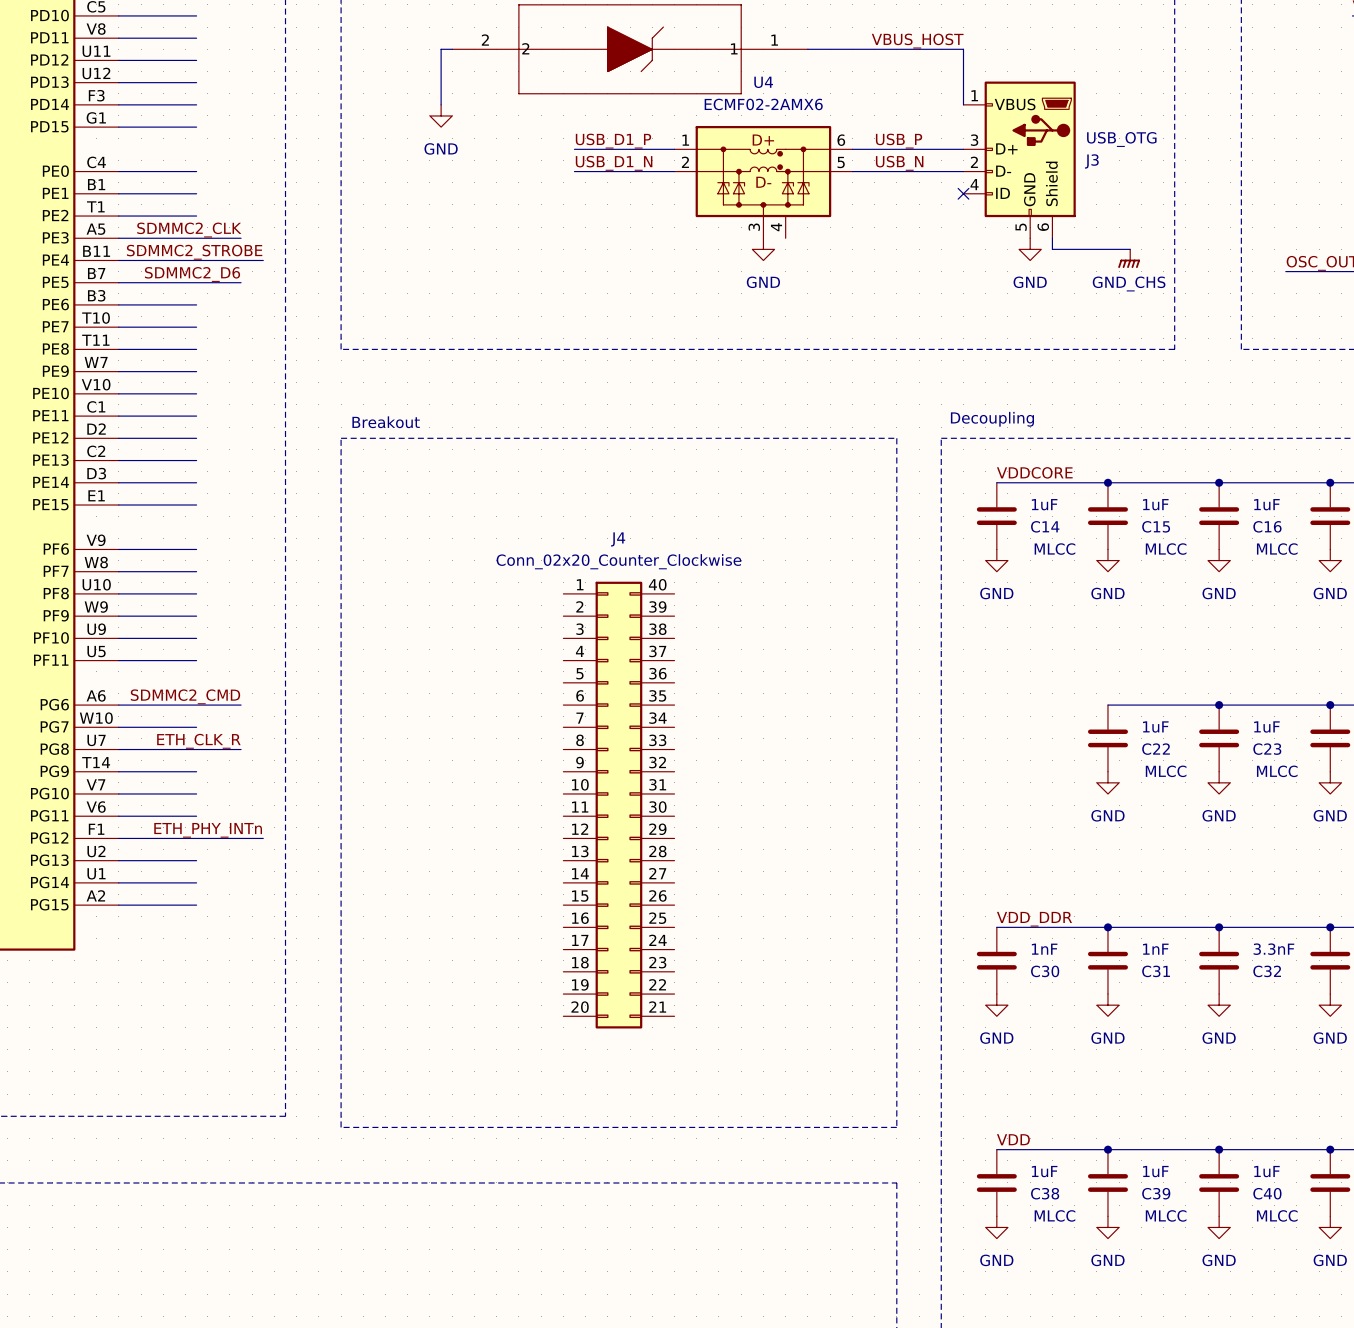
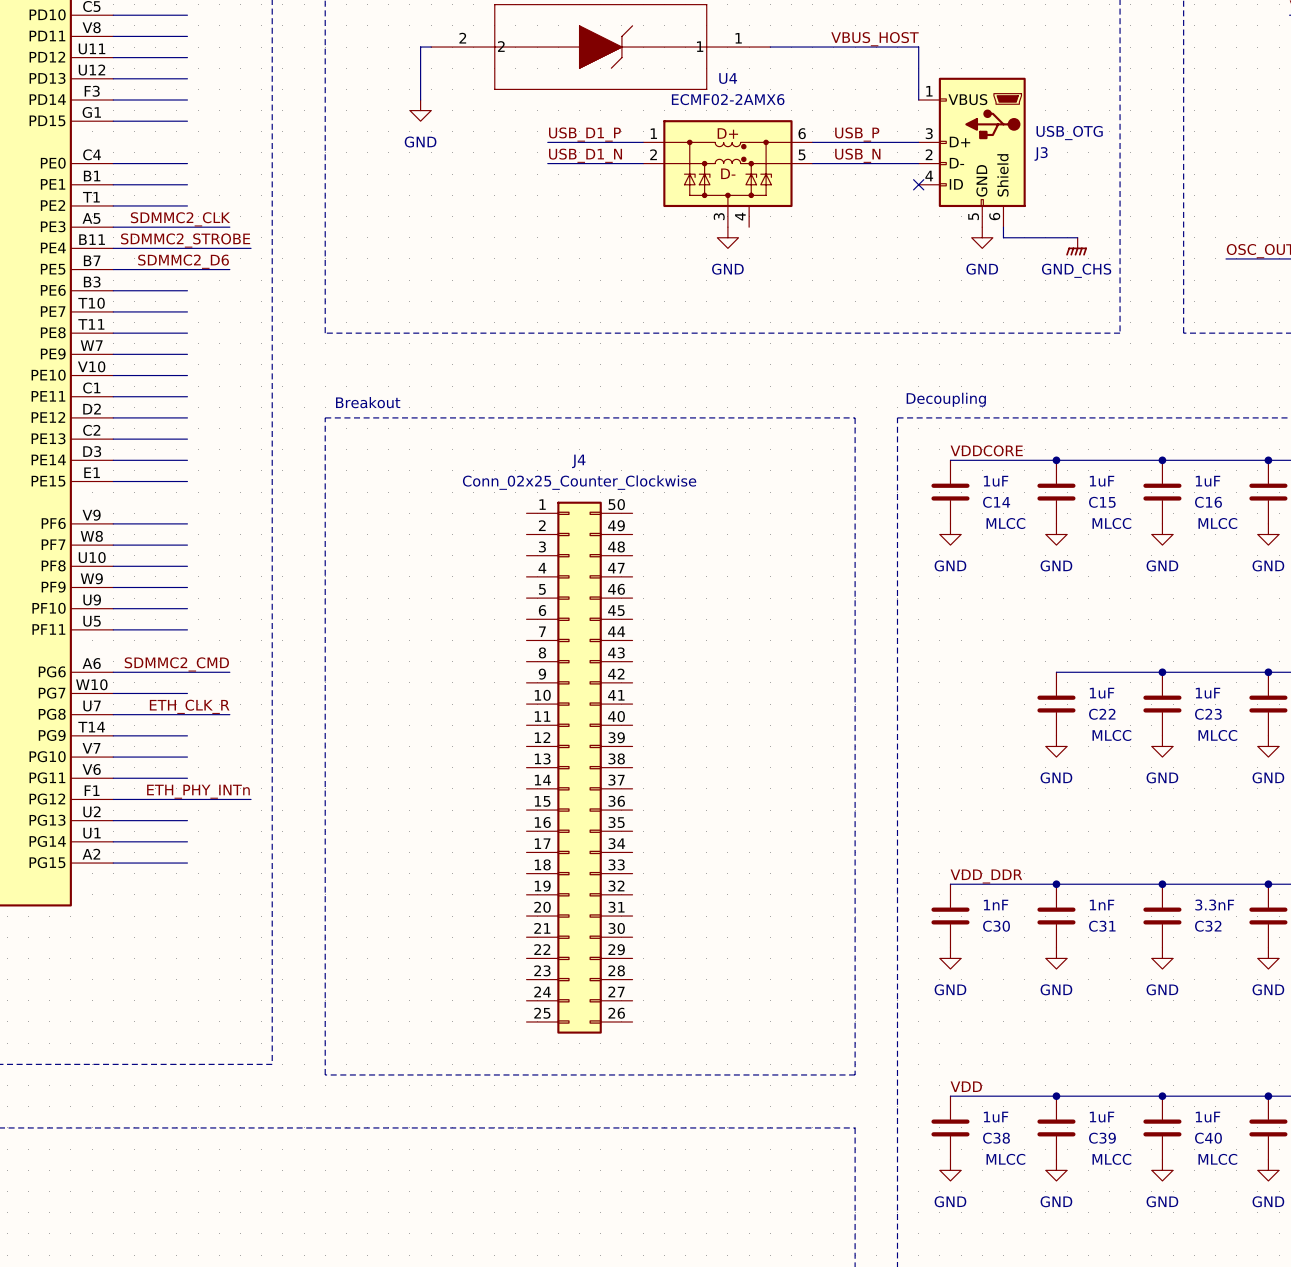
J4 name position: J4 (618, 539) -> J4 (578, 461)
J4 value: Conn_02x20_Counter_Clockwise (618, 561) -> Conn_02x25_Counter_Clockwise (579, 482)
J4 symbol: [563, 581, 675, 1029] -> [526, 501, 633, 1034]

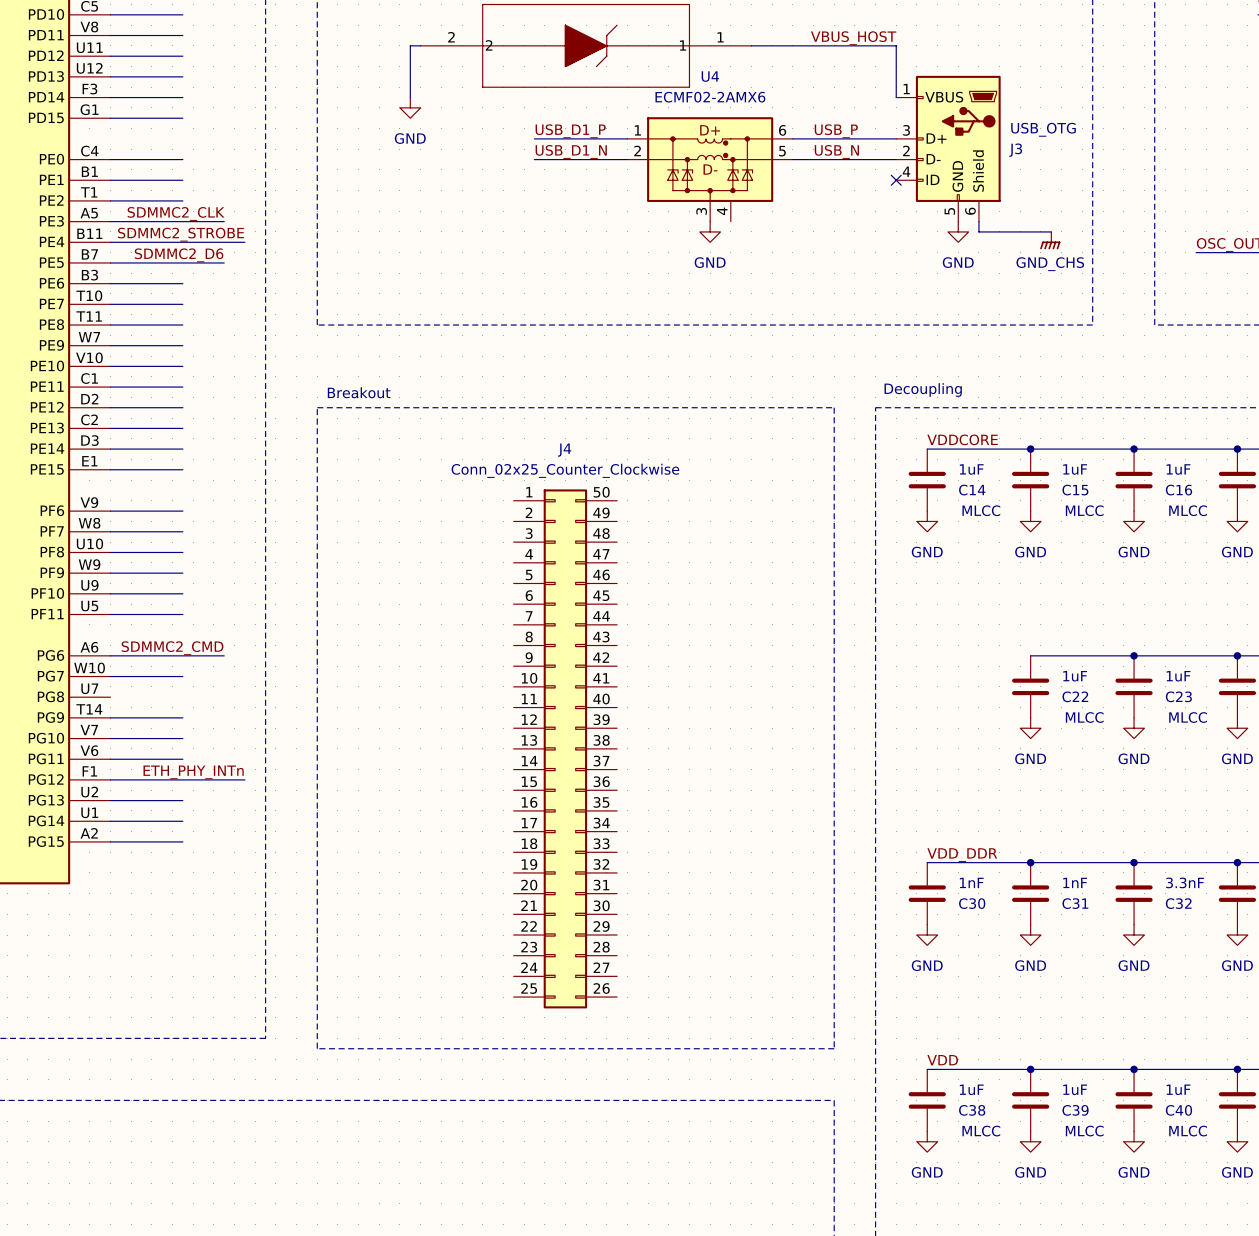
label: ETH_CLK_R (189, 706) -> none
wire: (113, 714) (229, 714) -> none

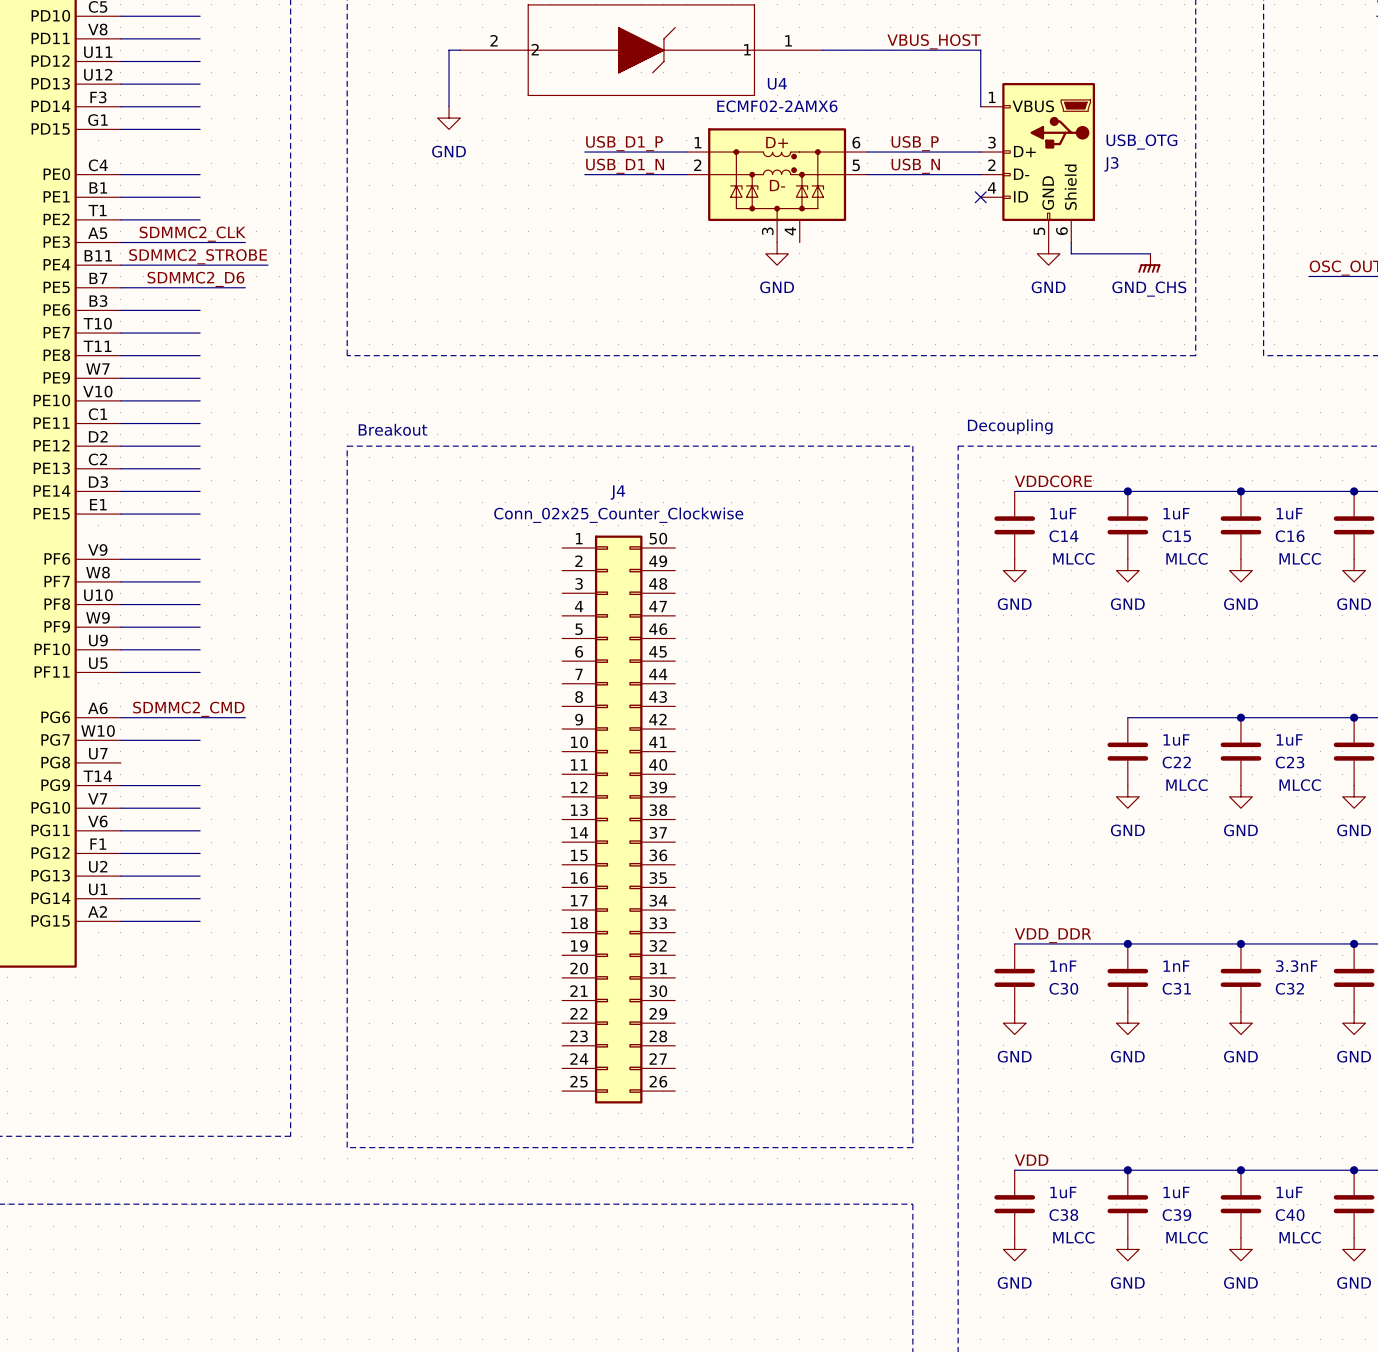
label: ETH_PHY_INTn (193, 772) -> none
wire: (182, 779) (244, 779) -> none

